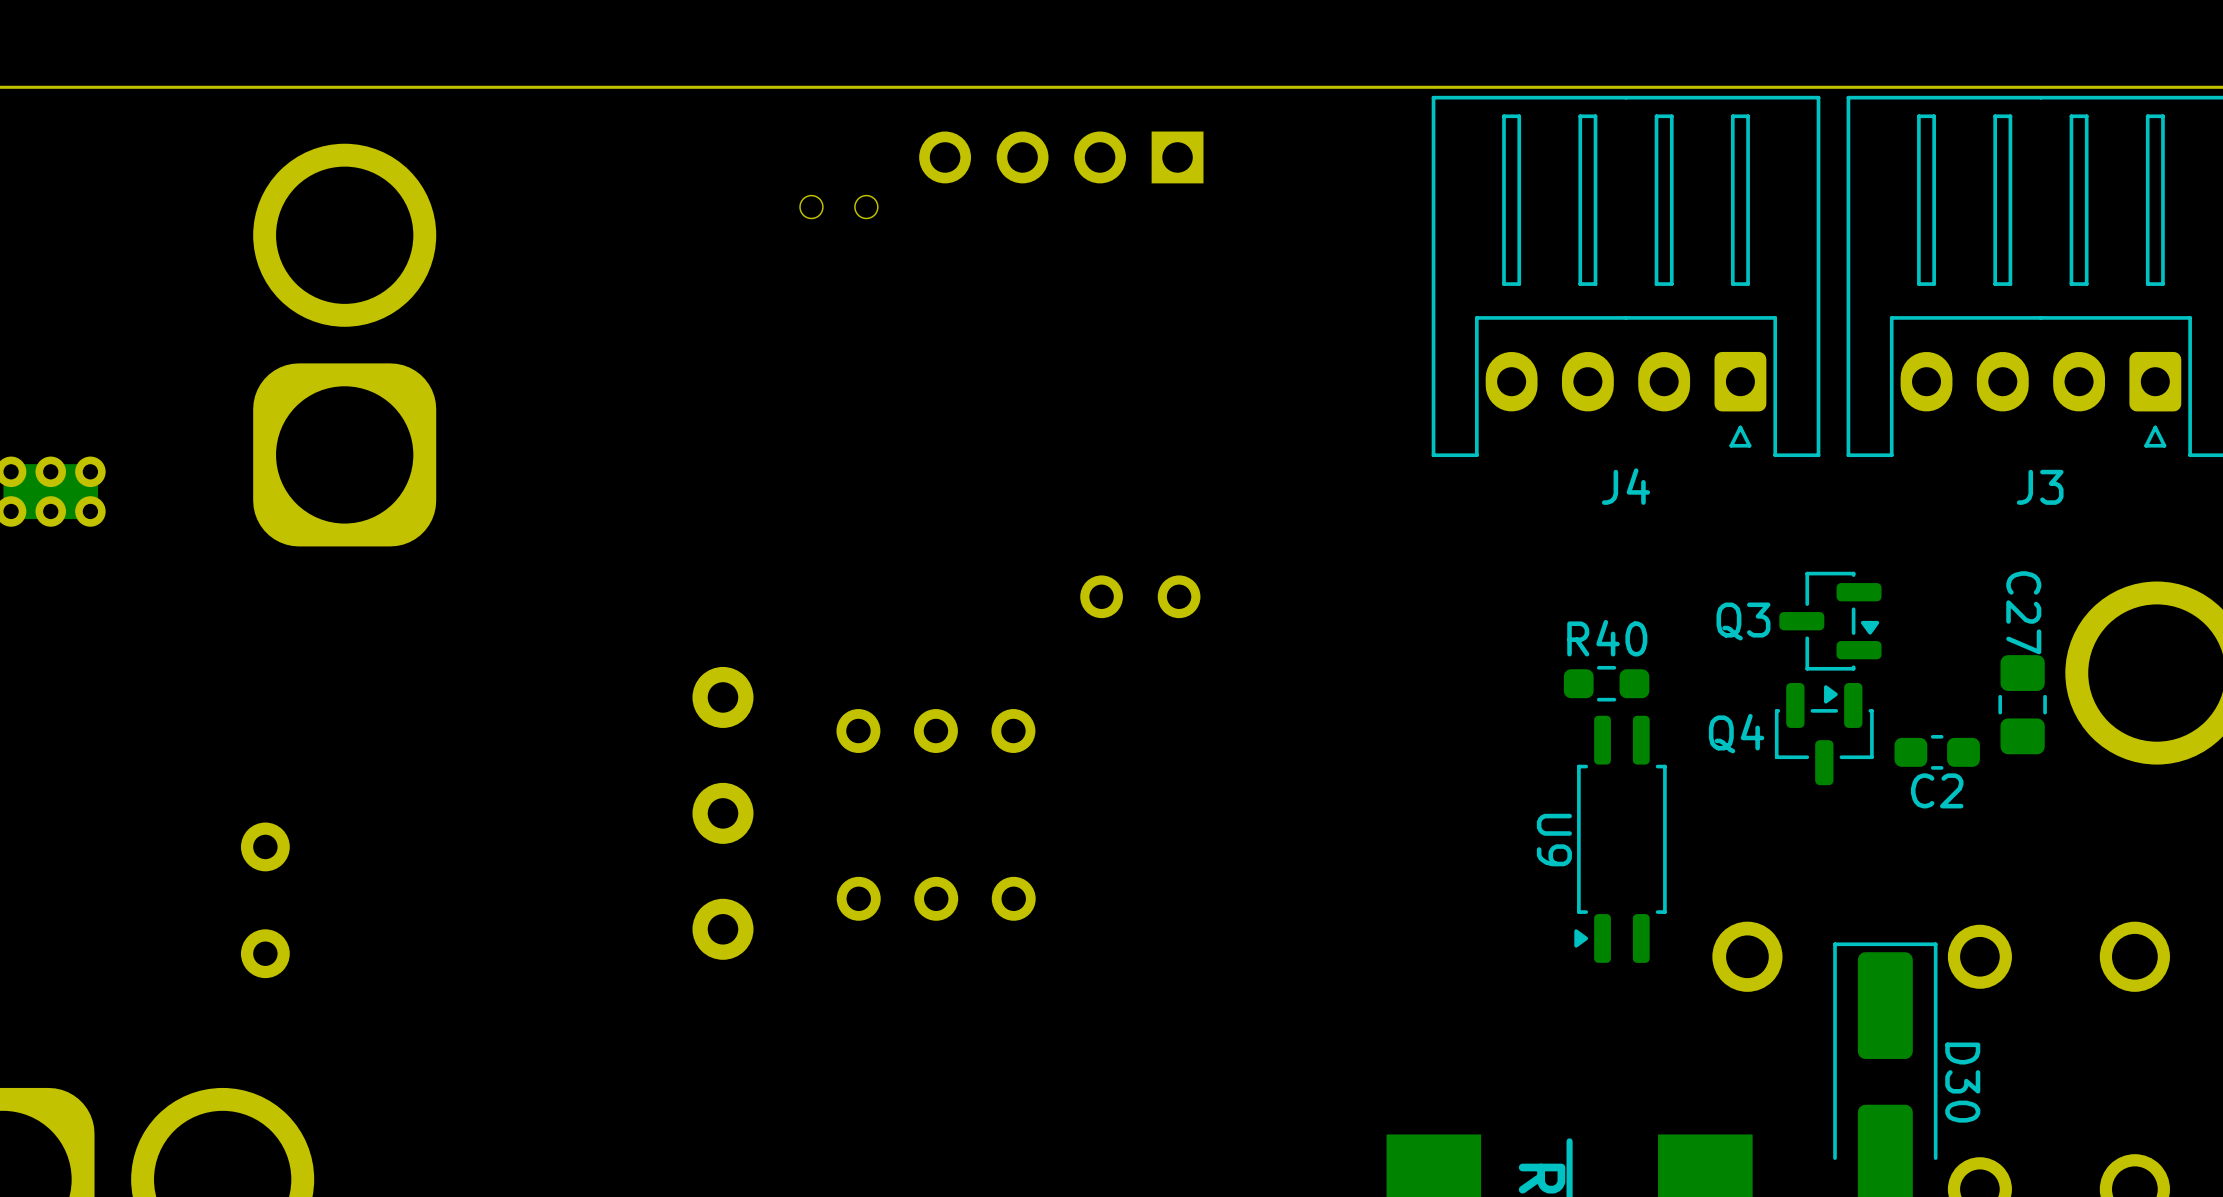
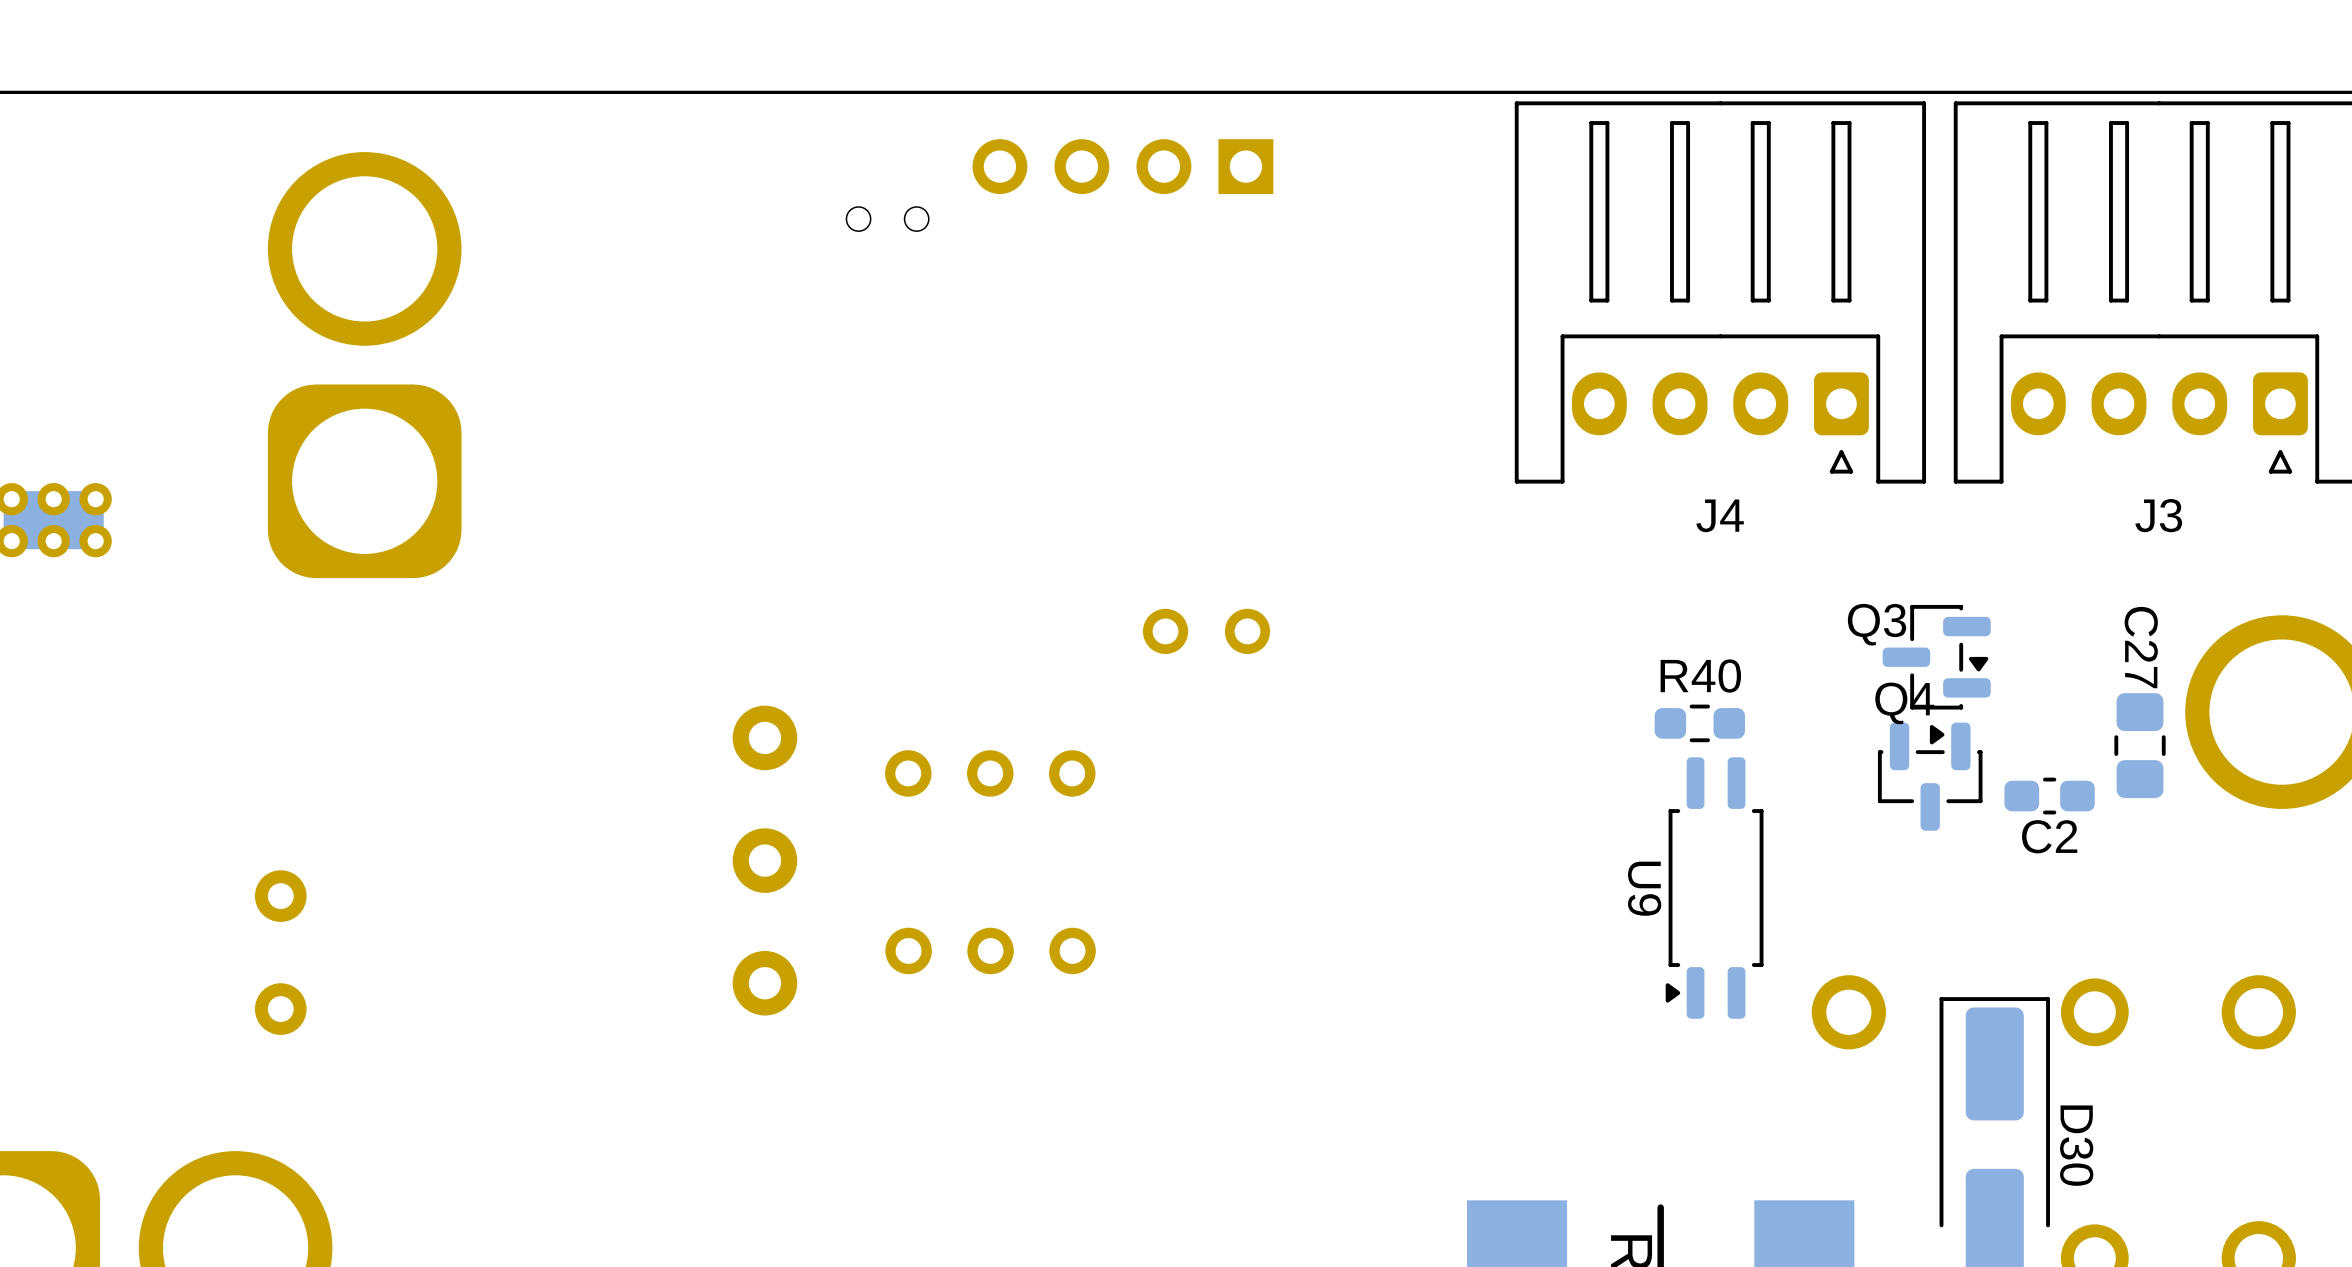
Q3 name position: Q3 (1743, 621) -> Q3 (1877, 624)
Q4 name position: Q4 (1736, 733) -> Q4 (1904, 703)

